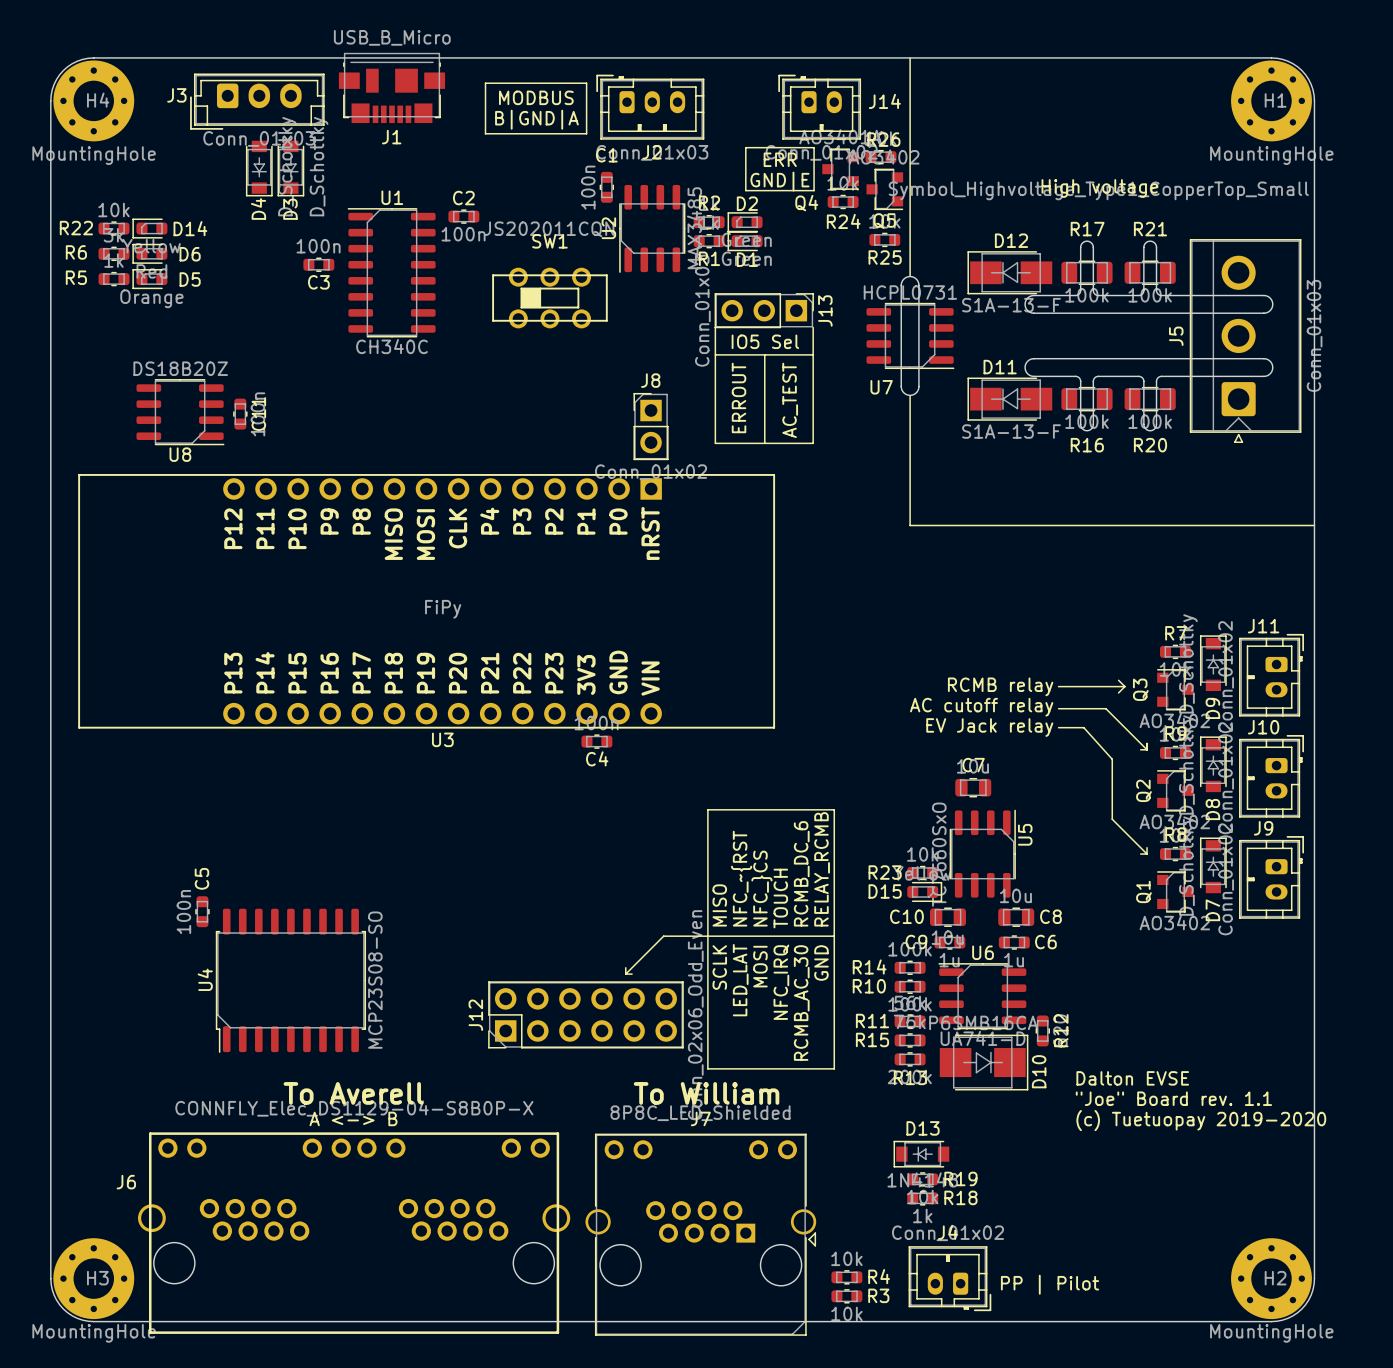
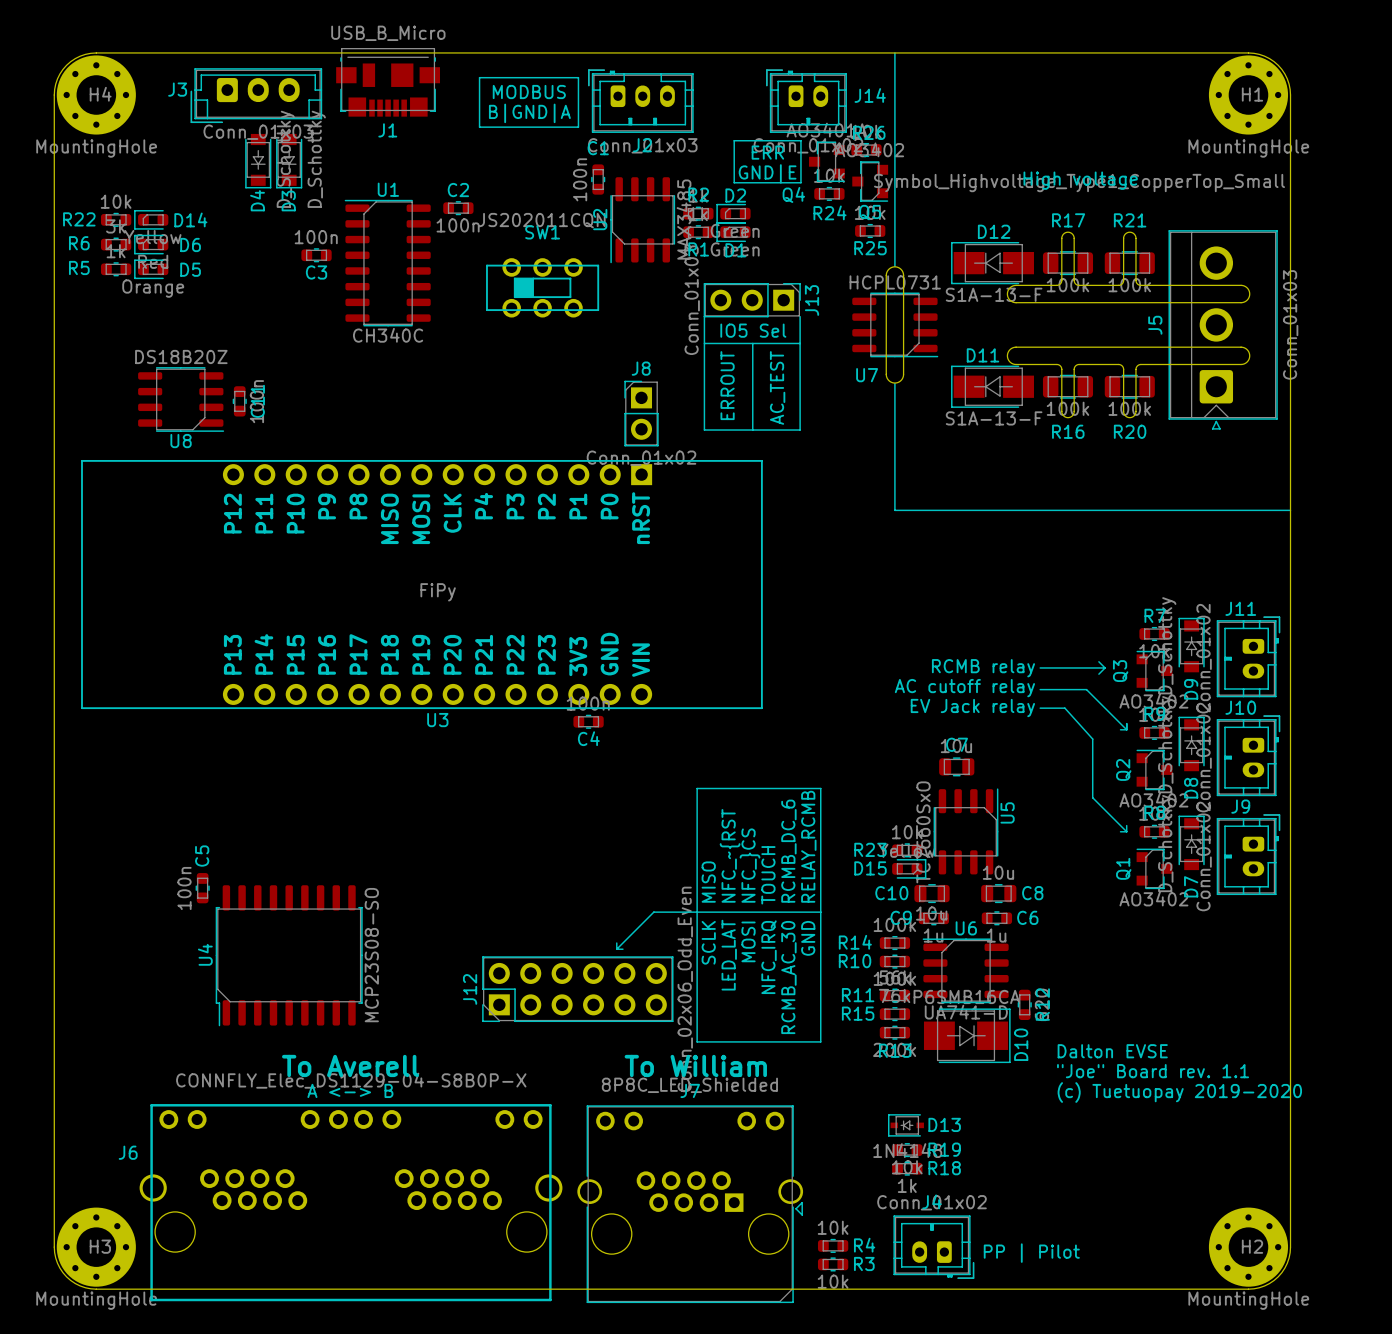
D13 name position: D13 (923, 1128) -> D13 (944, 1124)
D13 footprint: [893, 1140, 950, 1168] -> [888, 1114, 924, 1137]

